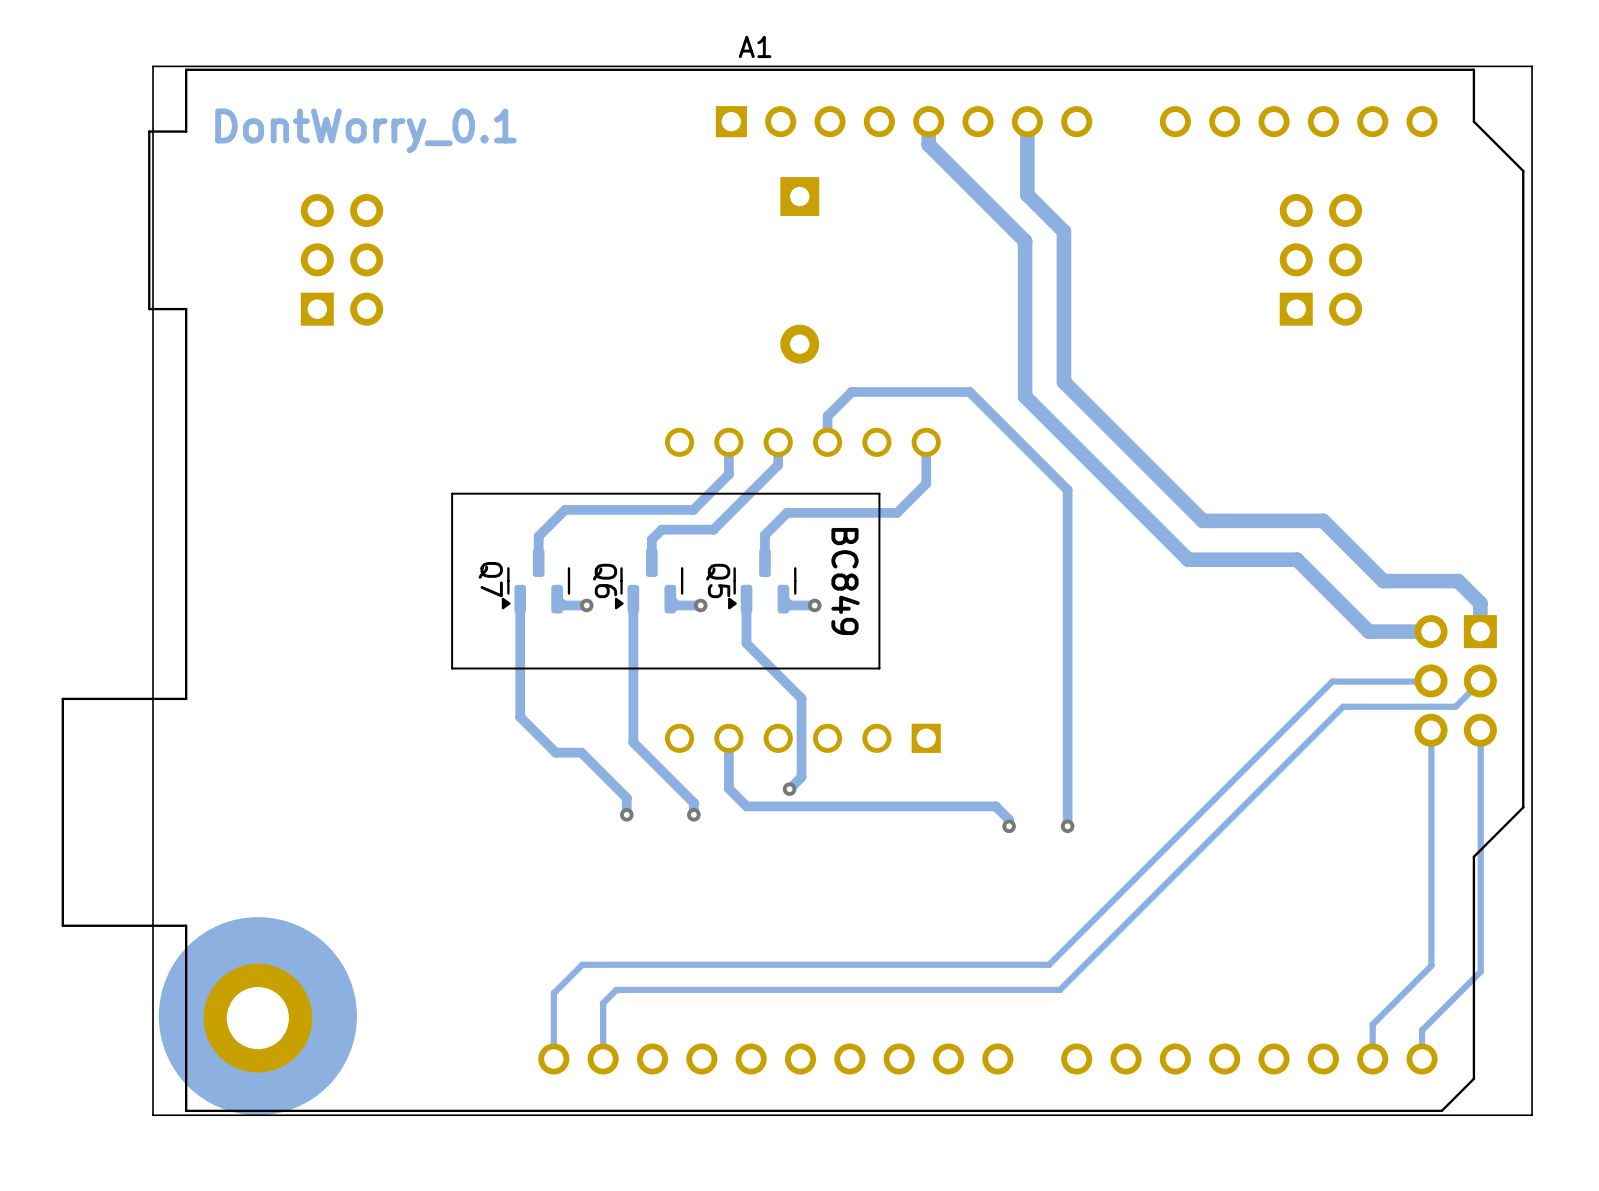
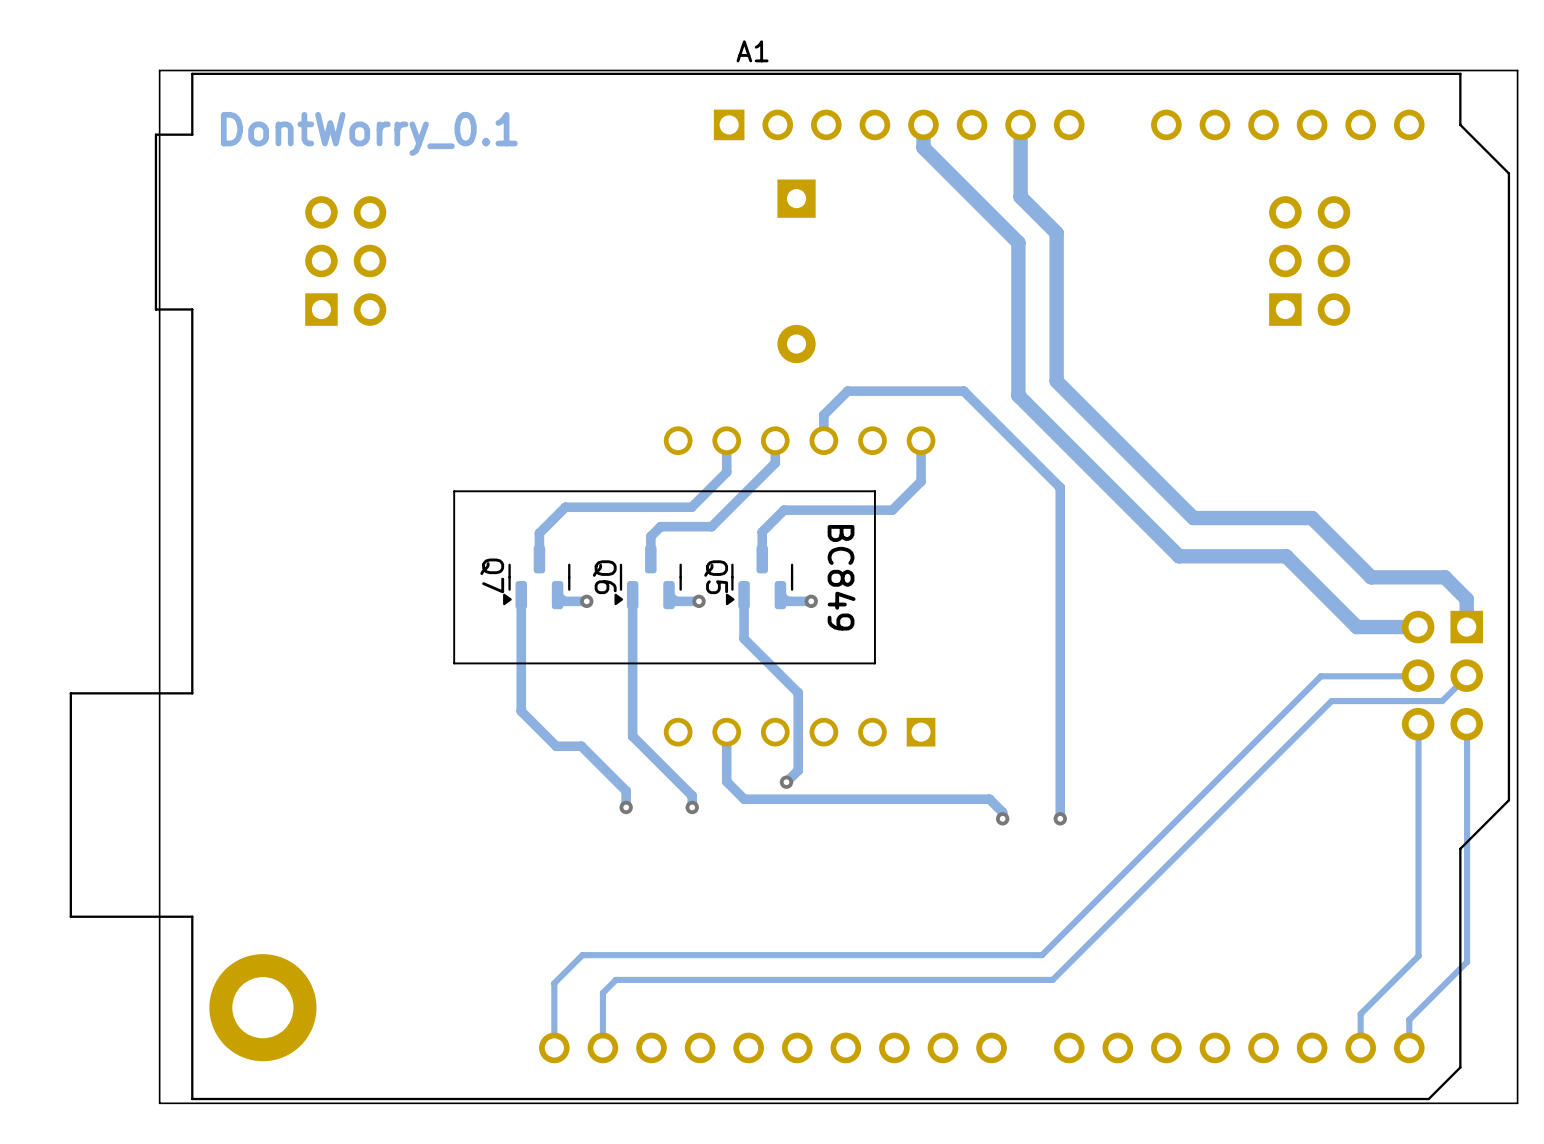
drawing: [158, 917, 357, 1116] -> none

